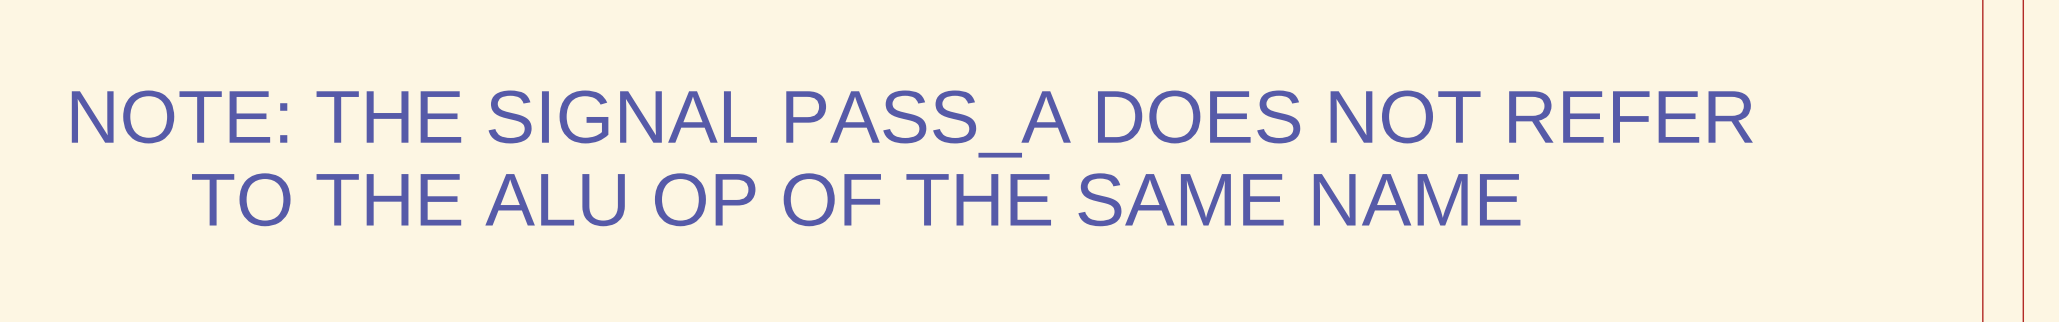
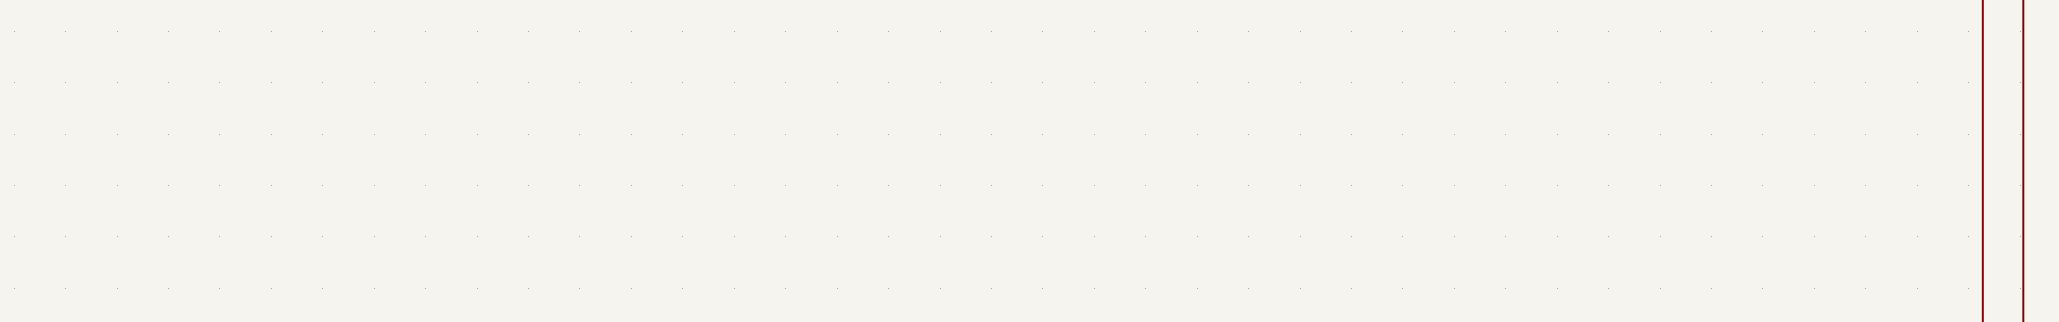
text: NOTE: THE SIGNAL PASS_A DOES NOT REFER (912, 124) -> none
text: TO THE ALU OP OF THE SAME NAME (856, 199) -> none

